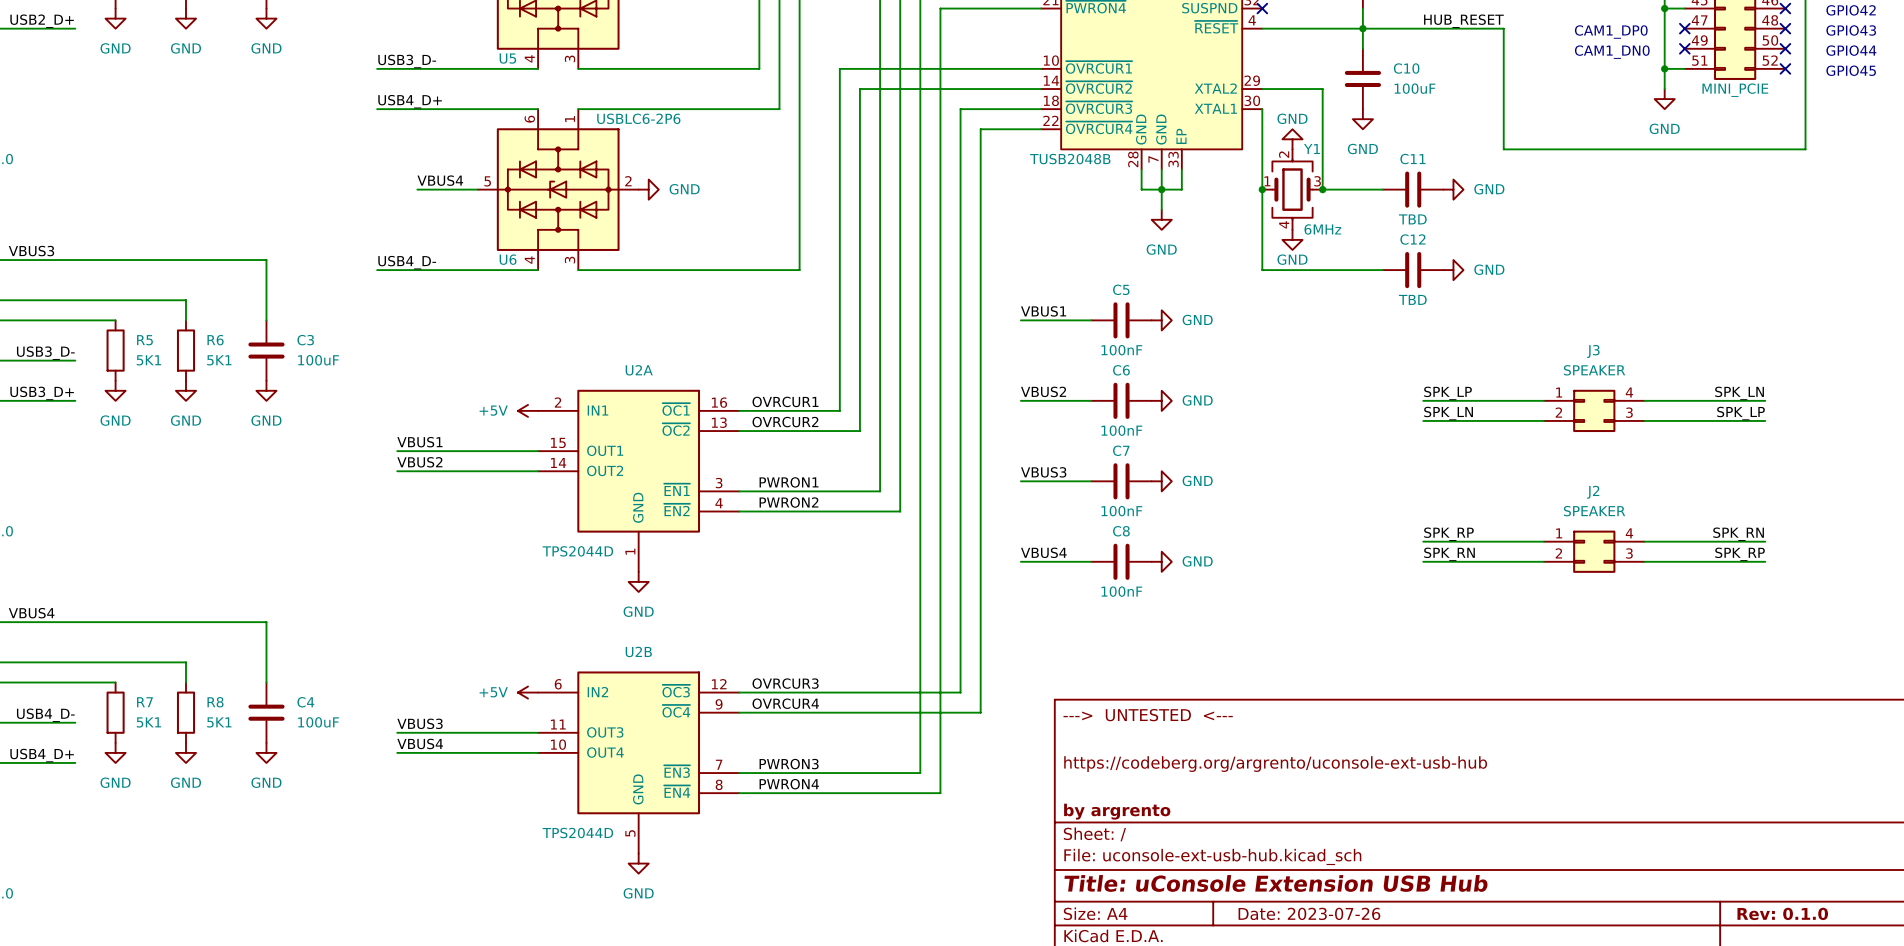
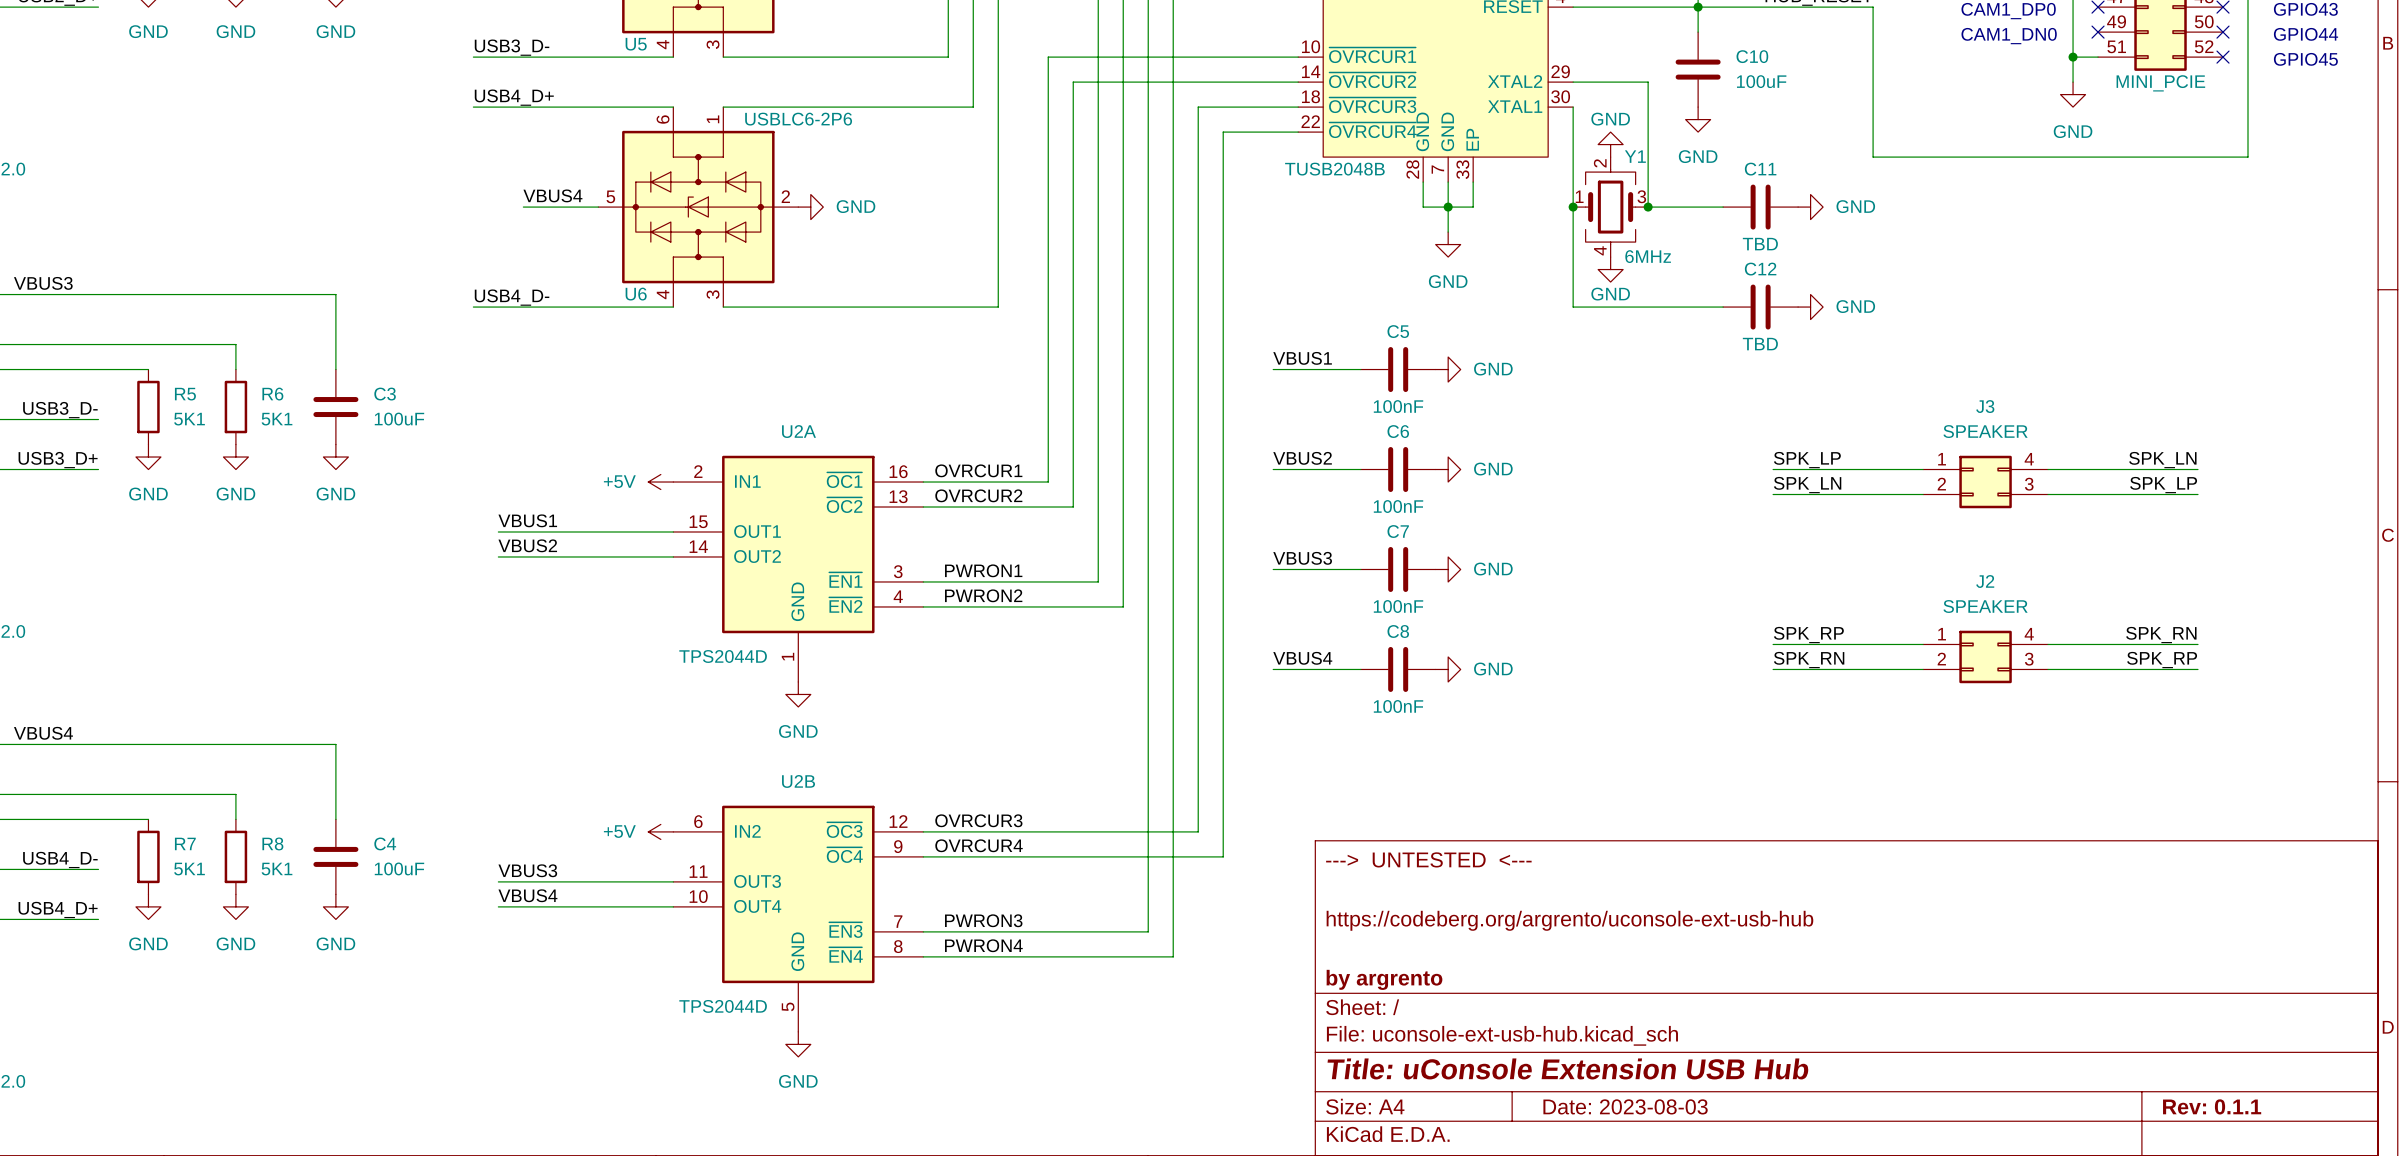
title block: Date: 2023-07-26 (1309, 913) -> Date: 2023-08-03 (1625, 1106)
title block: Rev: 0.1.0 (1782, 913) -> Rev: 0.1.1 (2212, 1106)

